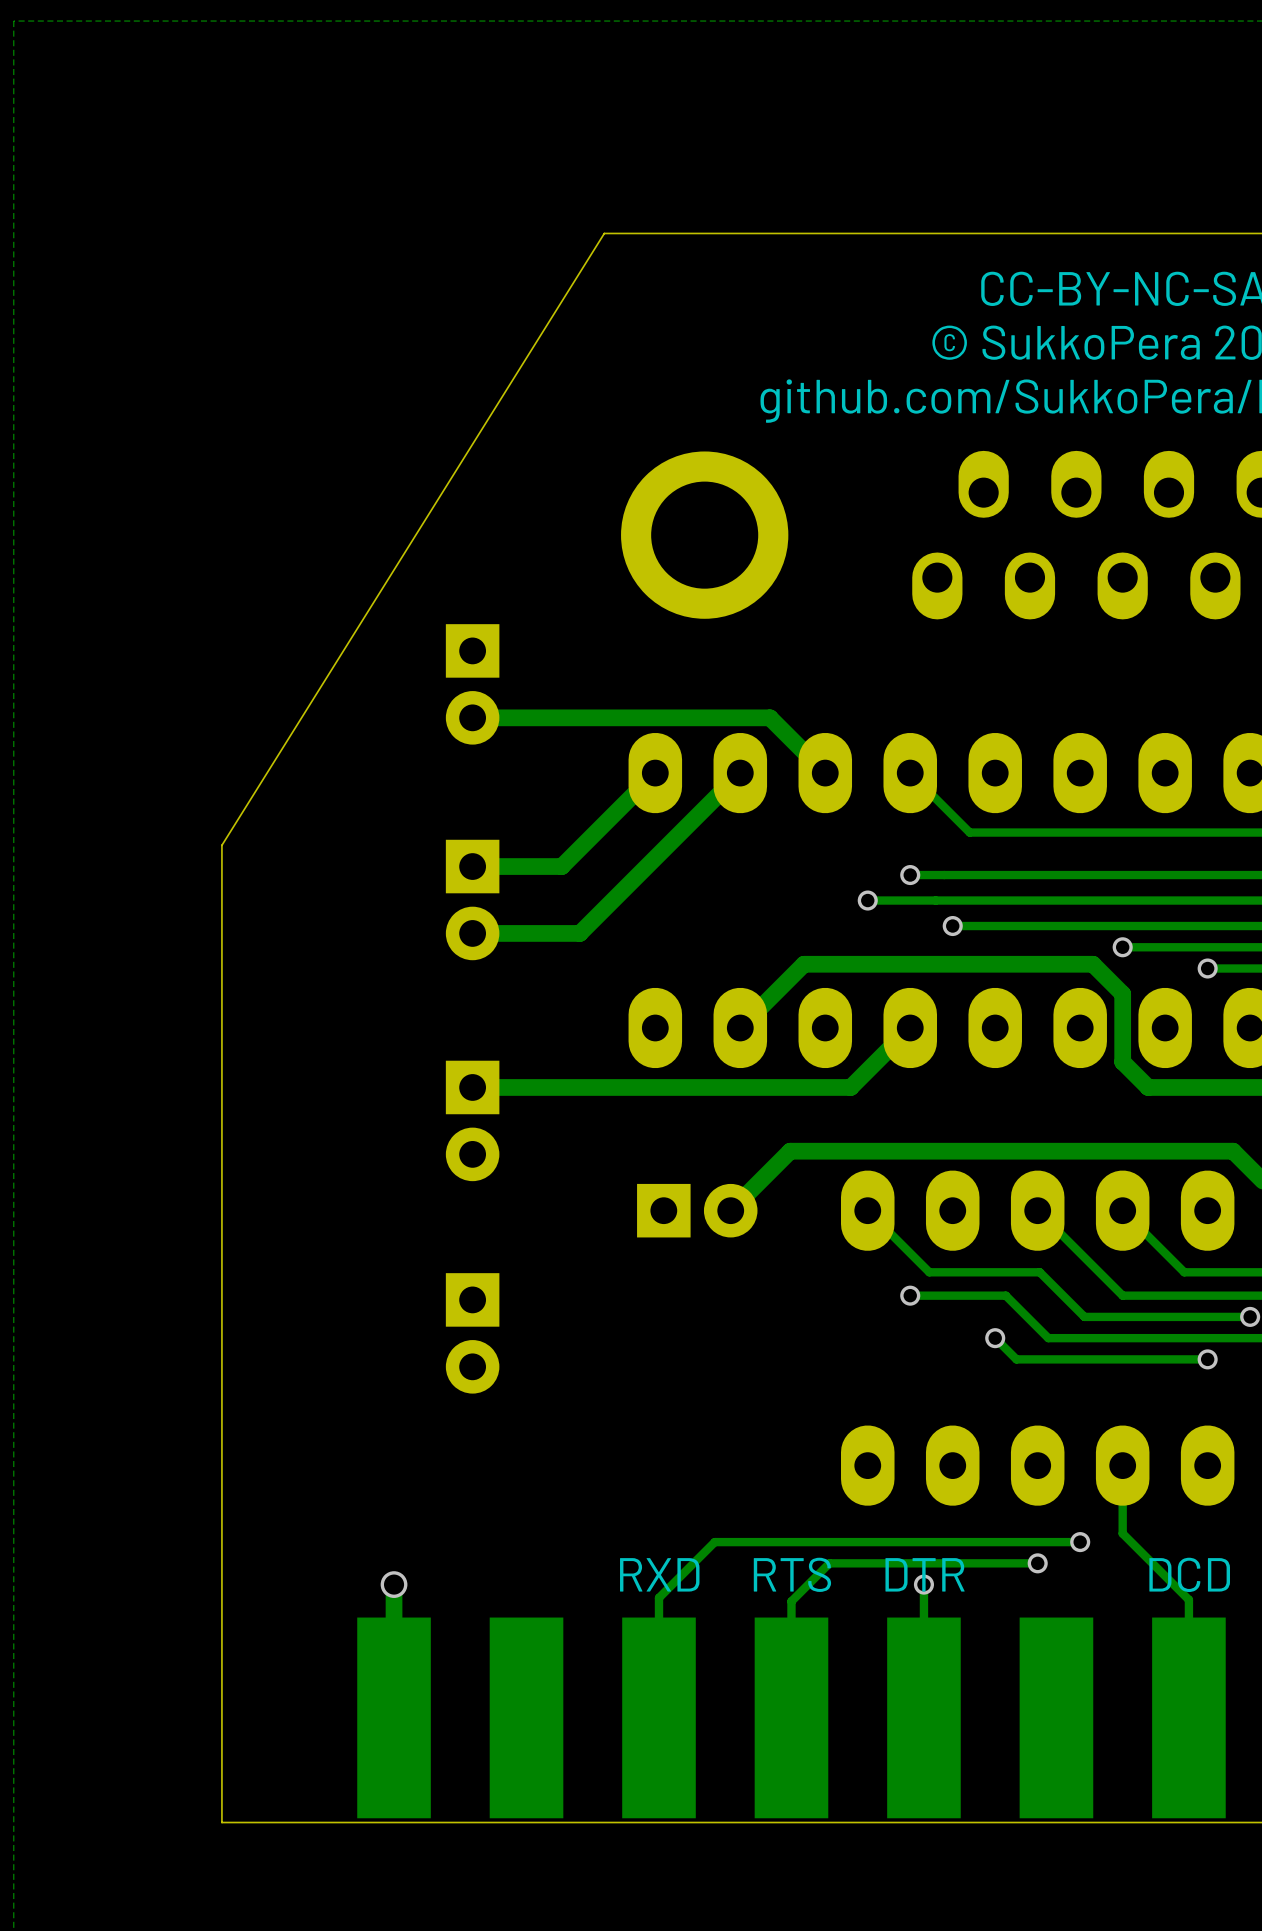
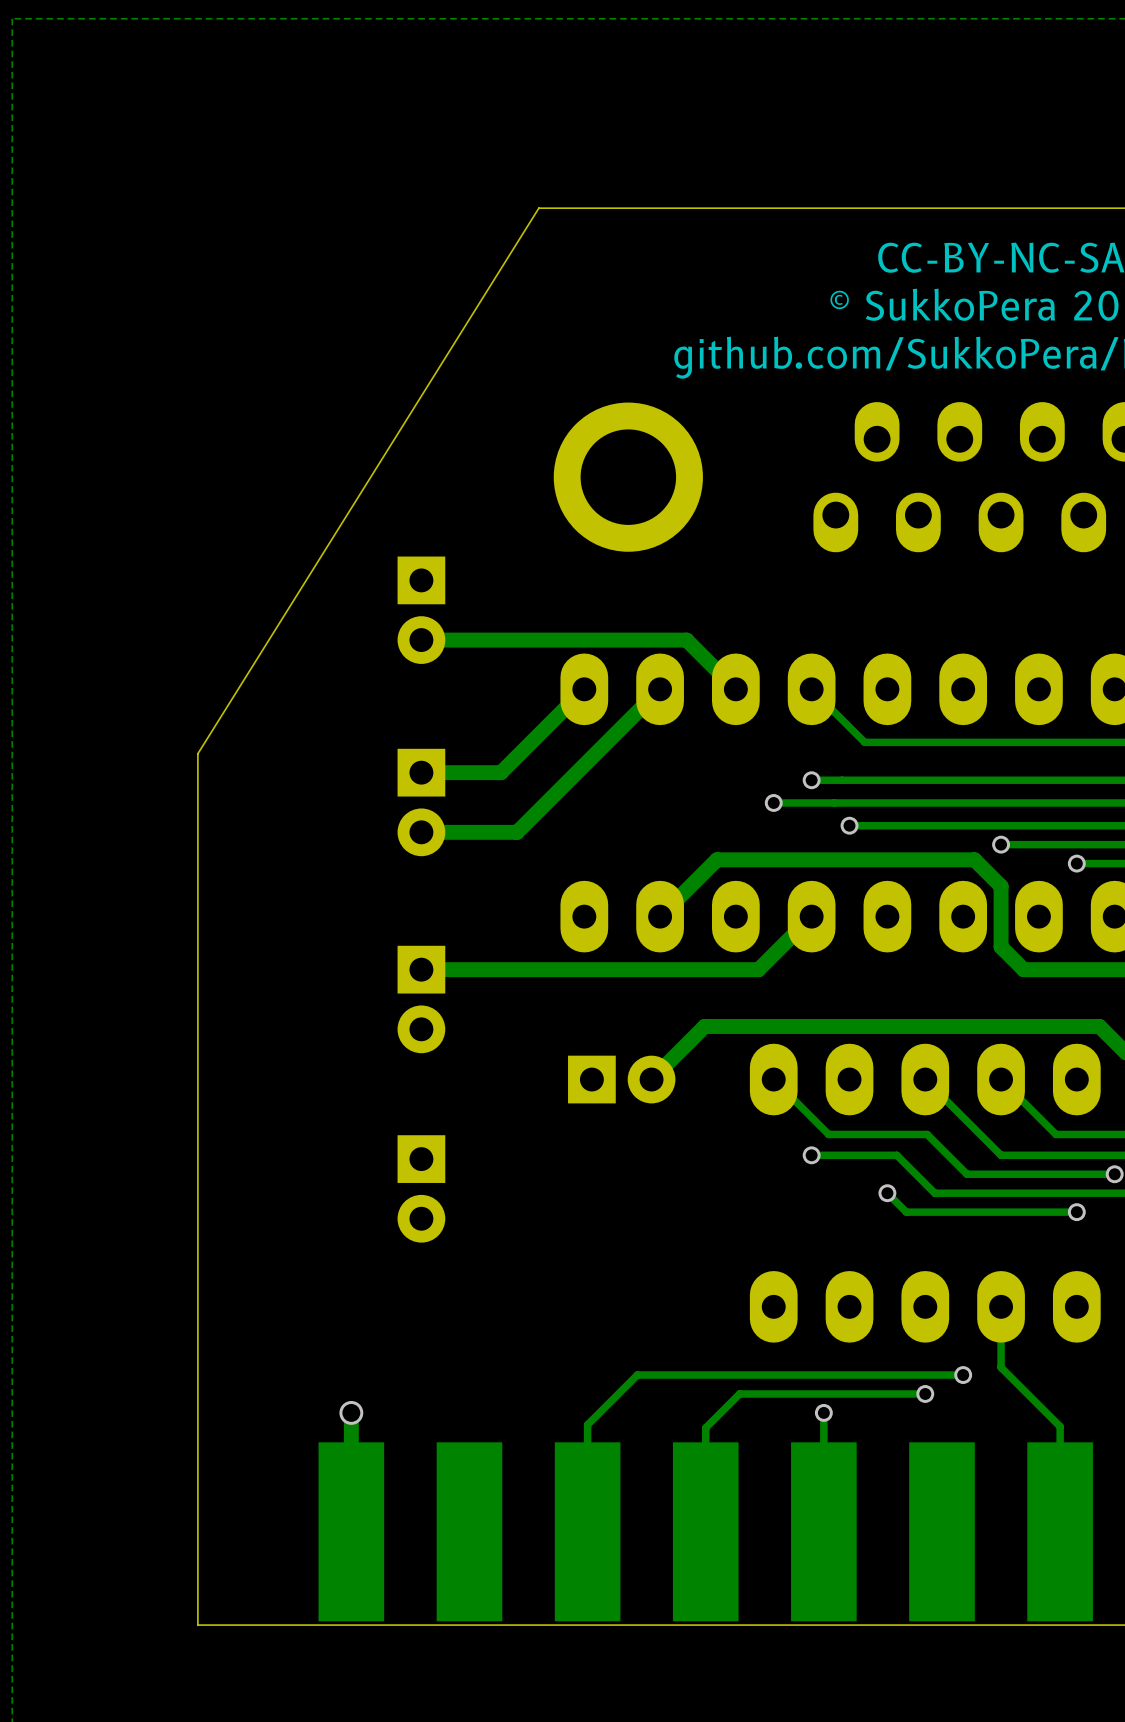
text: RXD (659, 1574) -> none
text: RTS (792, 1574) -> none
text: DTR (925, 1574) -> none
text: DCD (1189, 1574) -> none

